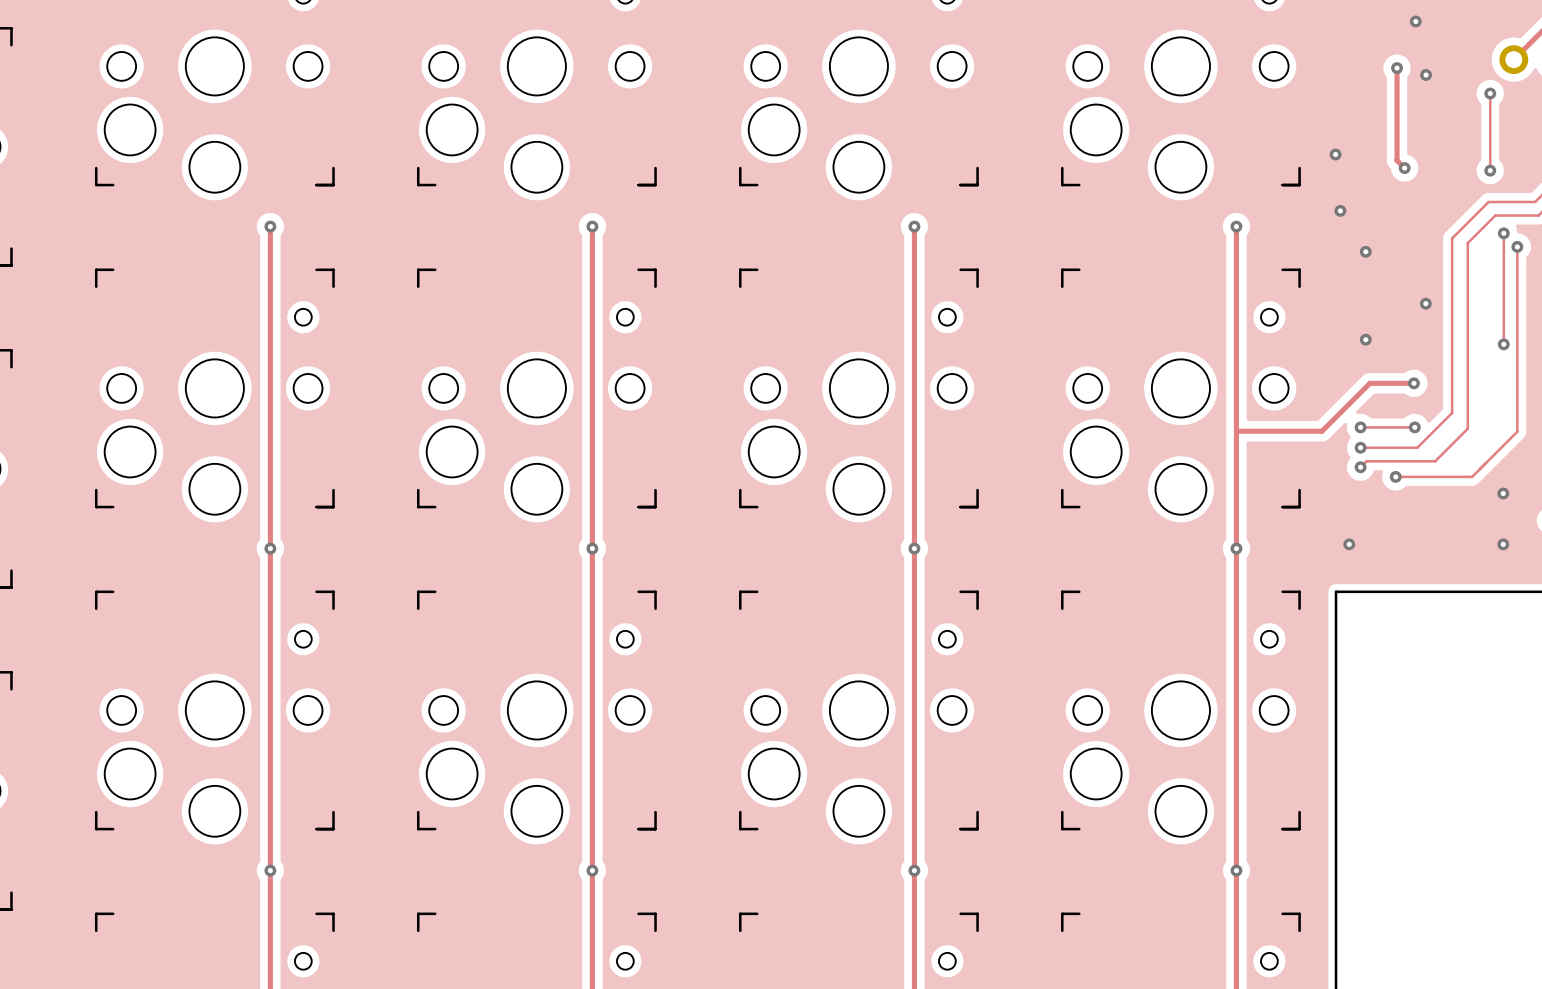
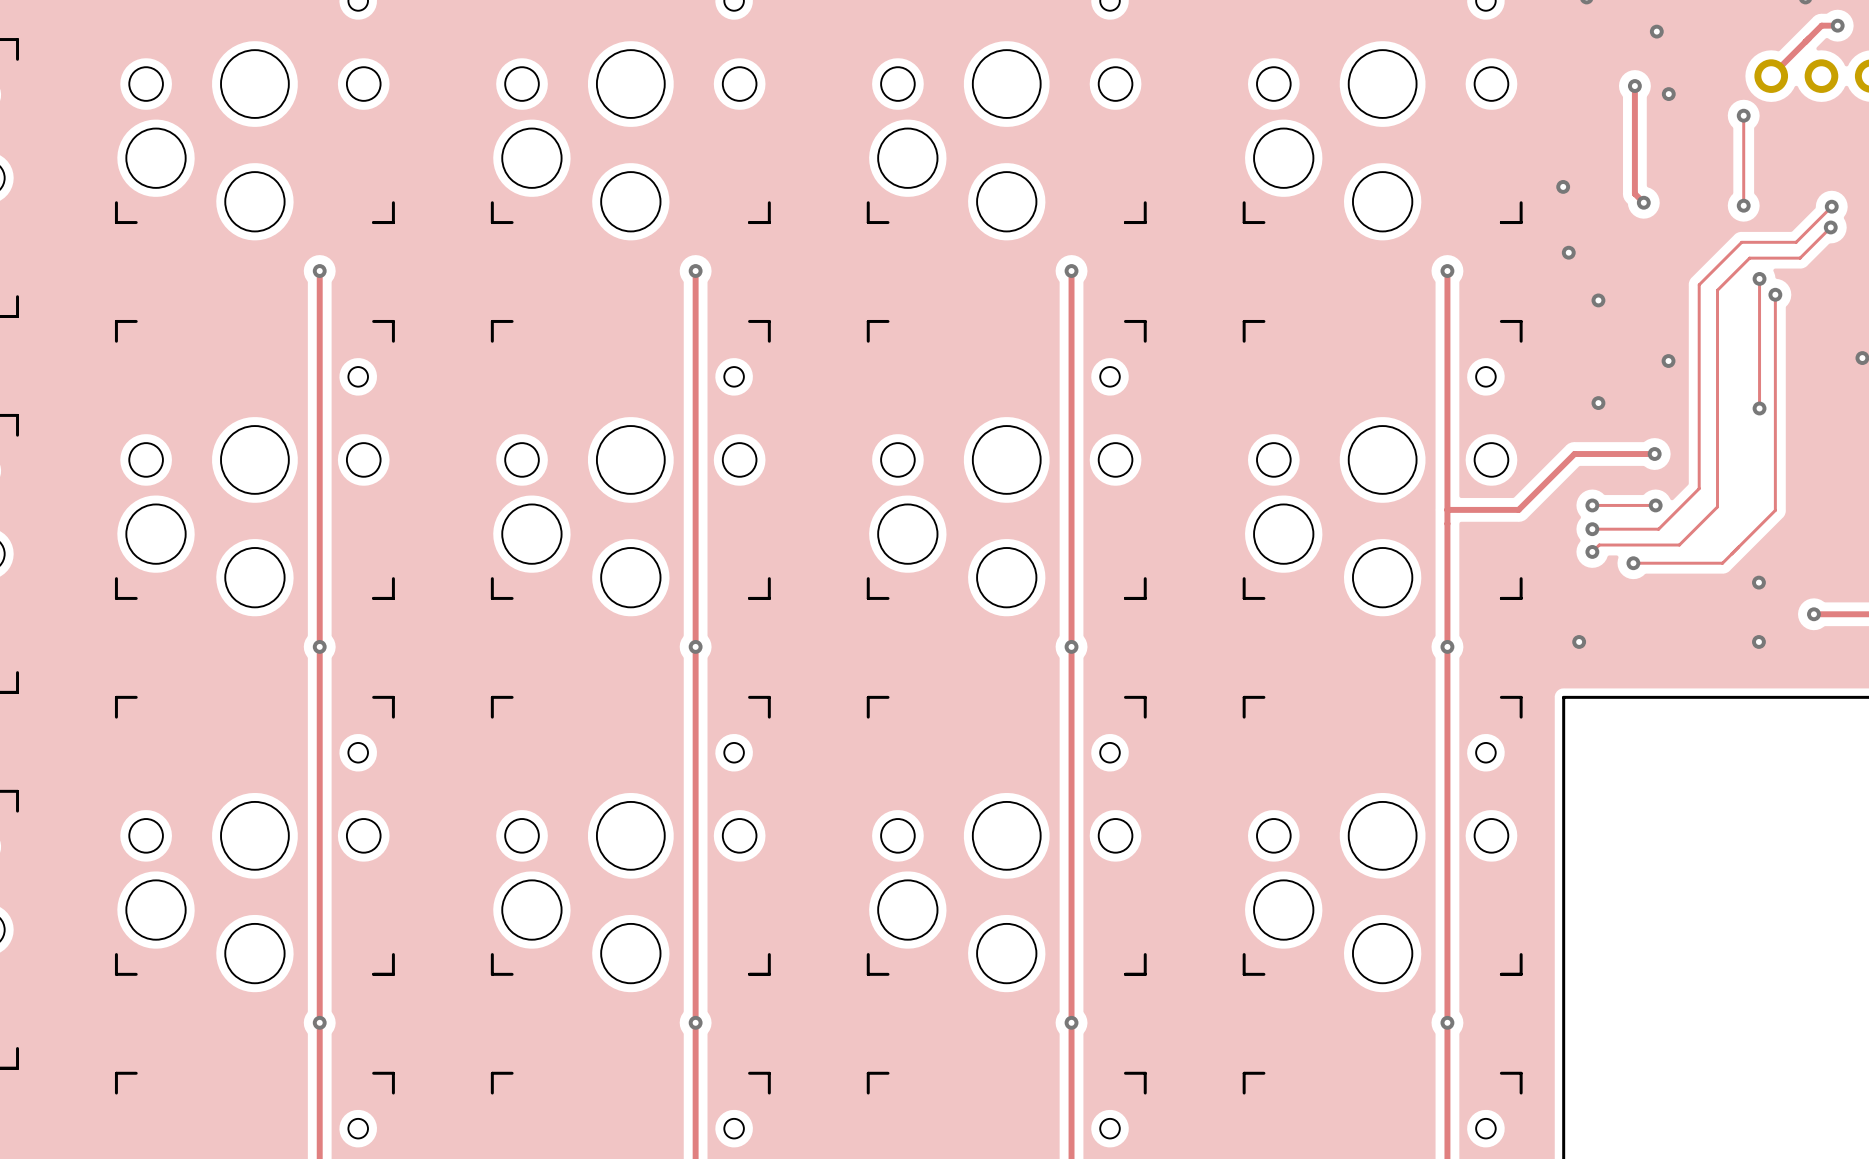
track: (1369, 383) (1322, 431) (1297, 431) -> (1603, 454) (1574, 454) (1518, 509)

